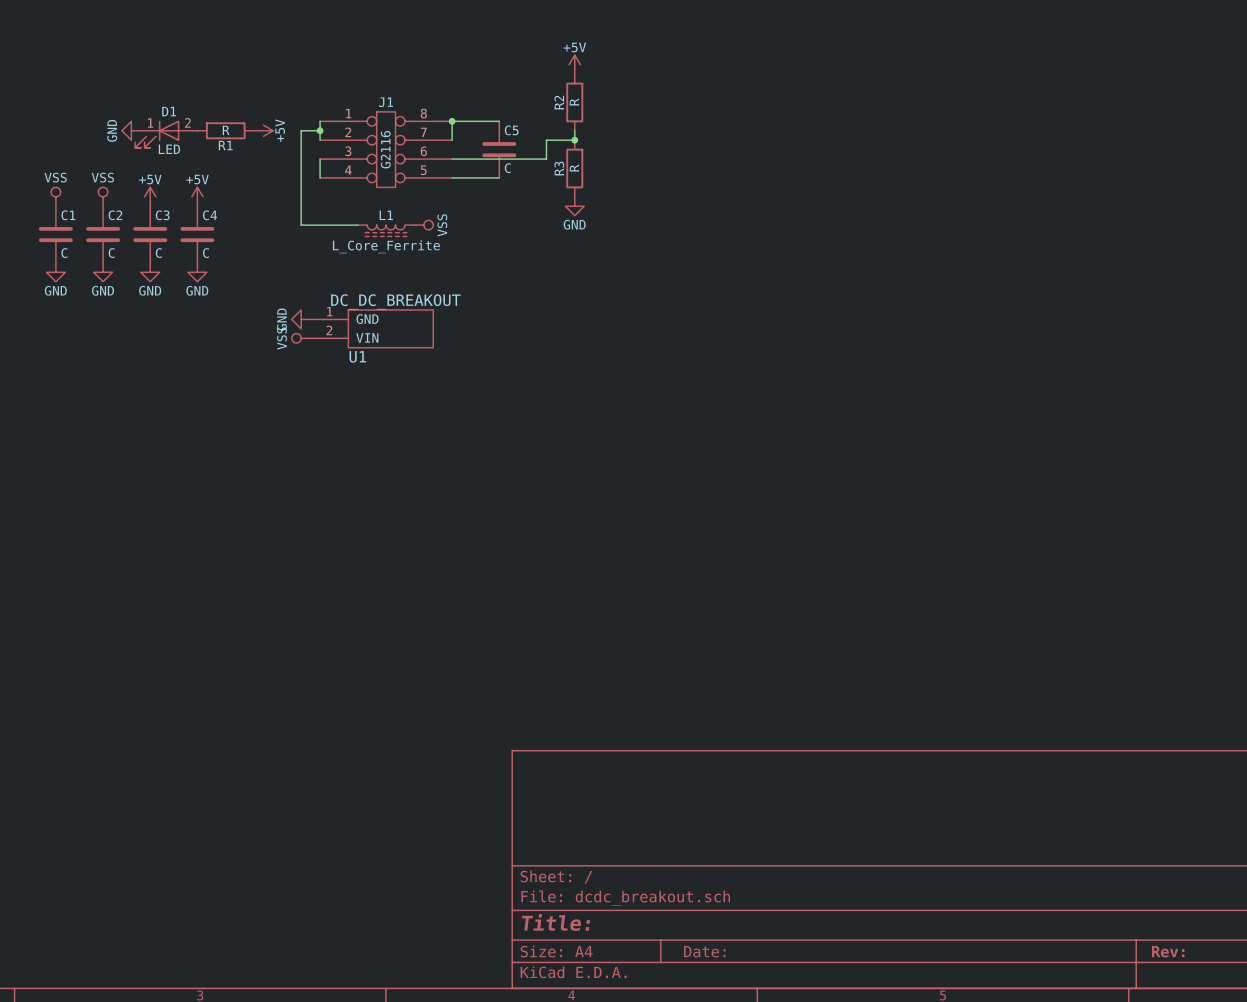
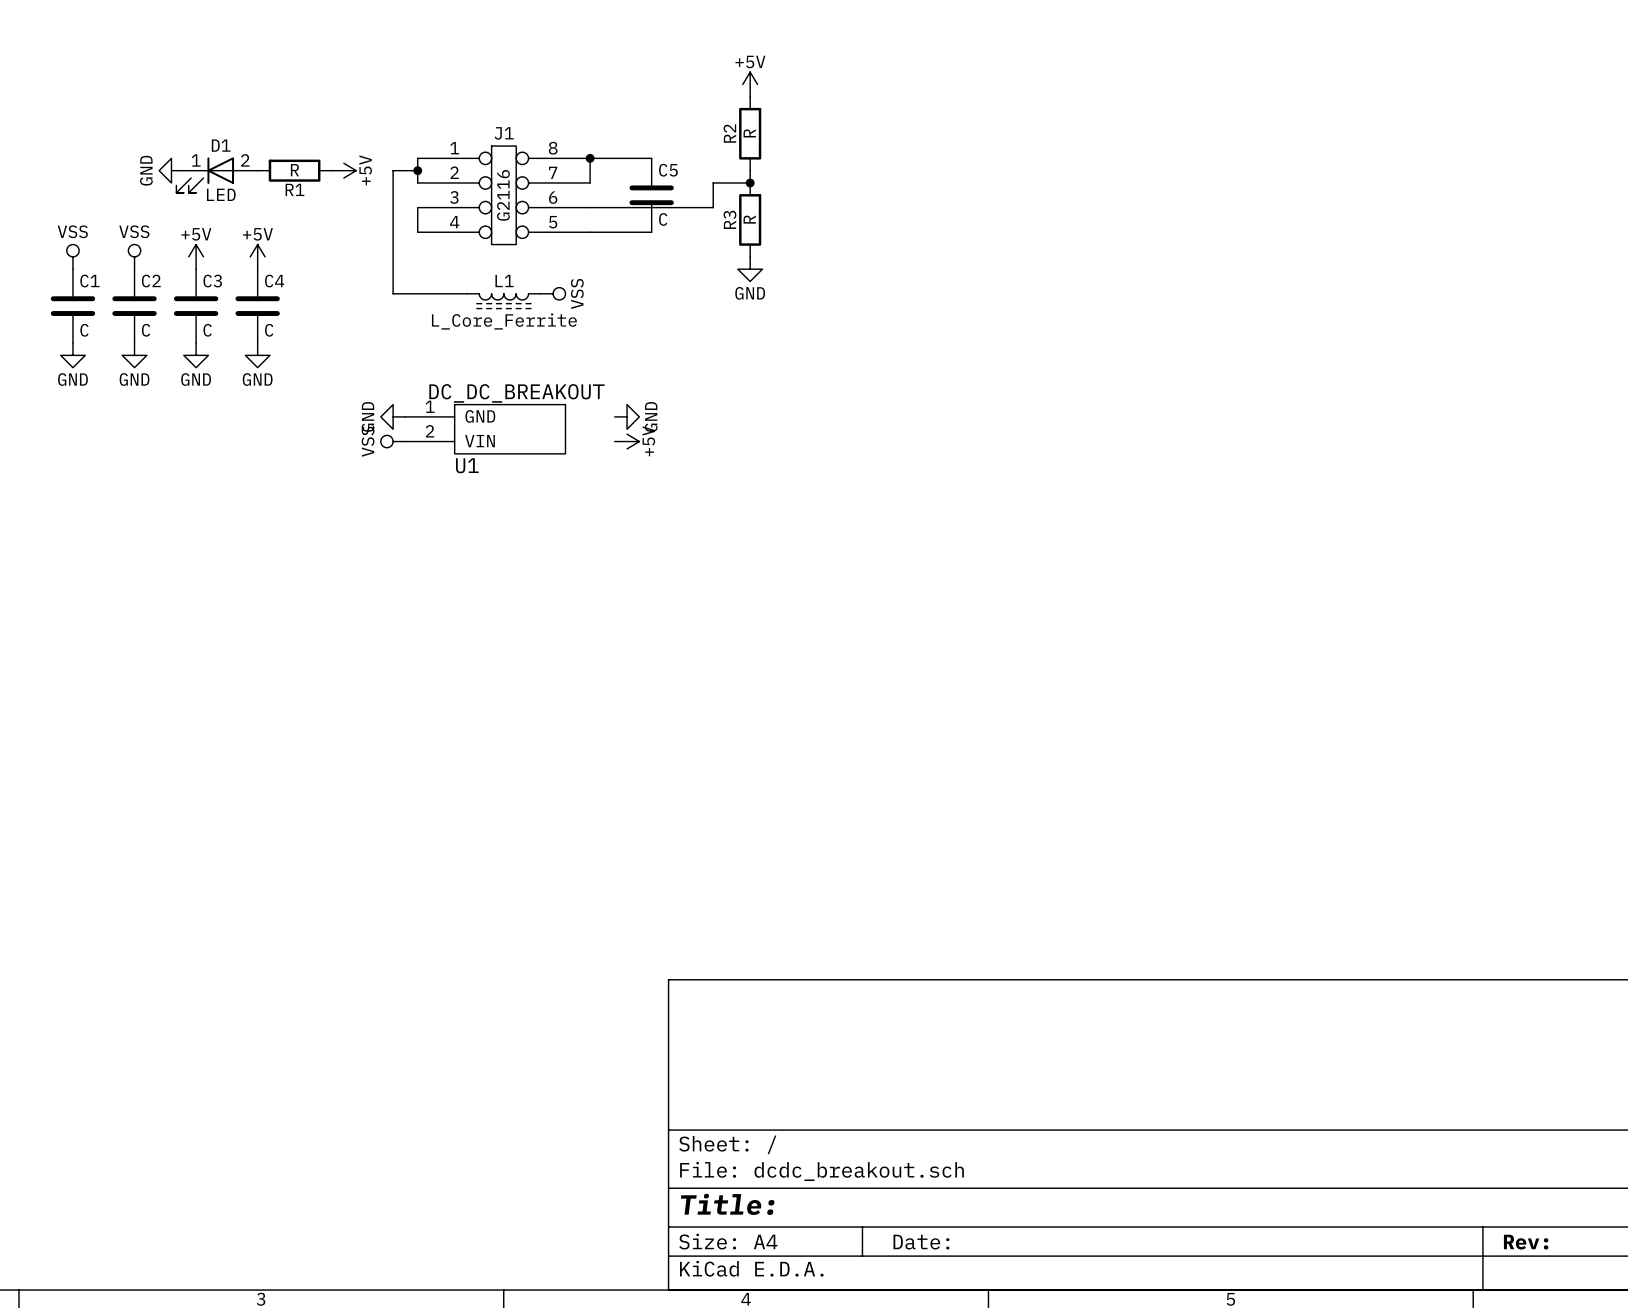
power symbol: none -> GND (627, 416)
power symbol: none -> +5V (627, 441)

